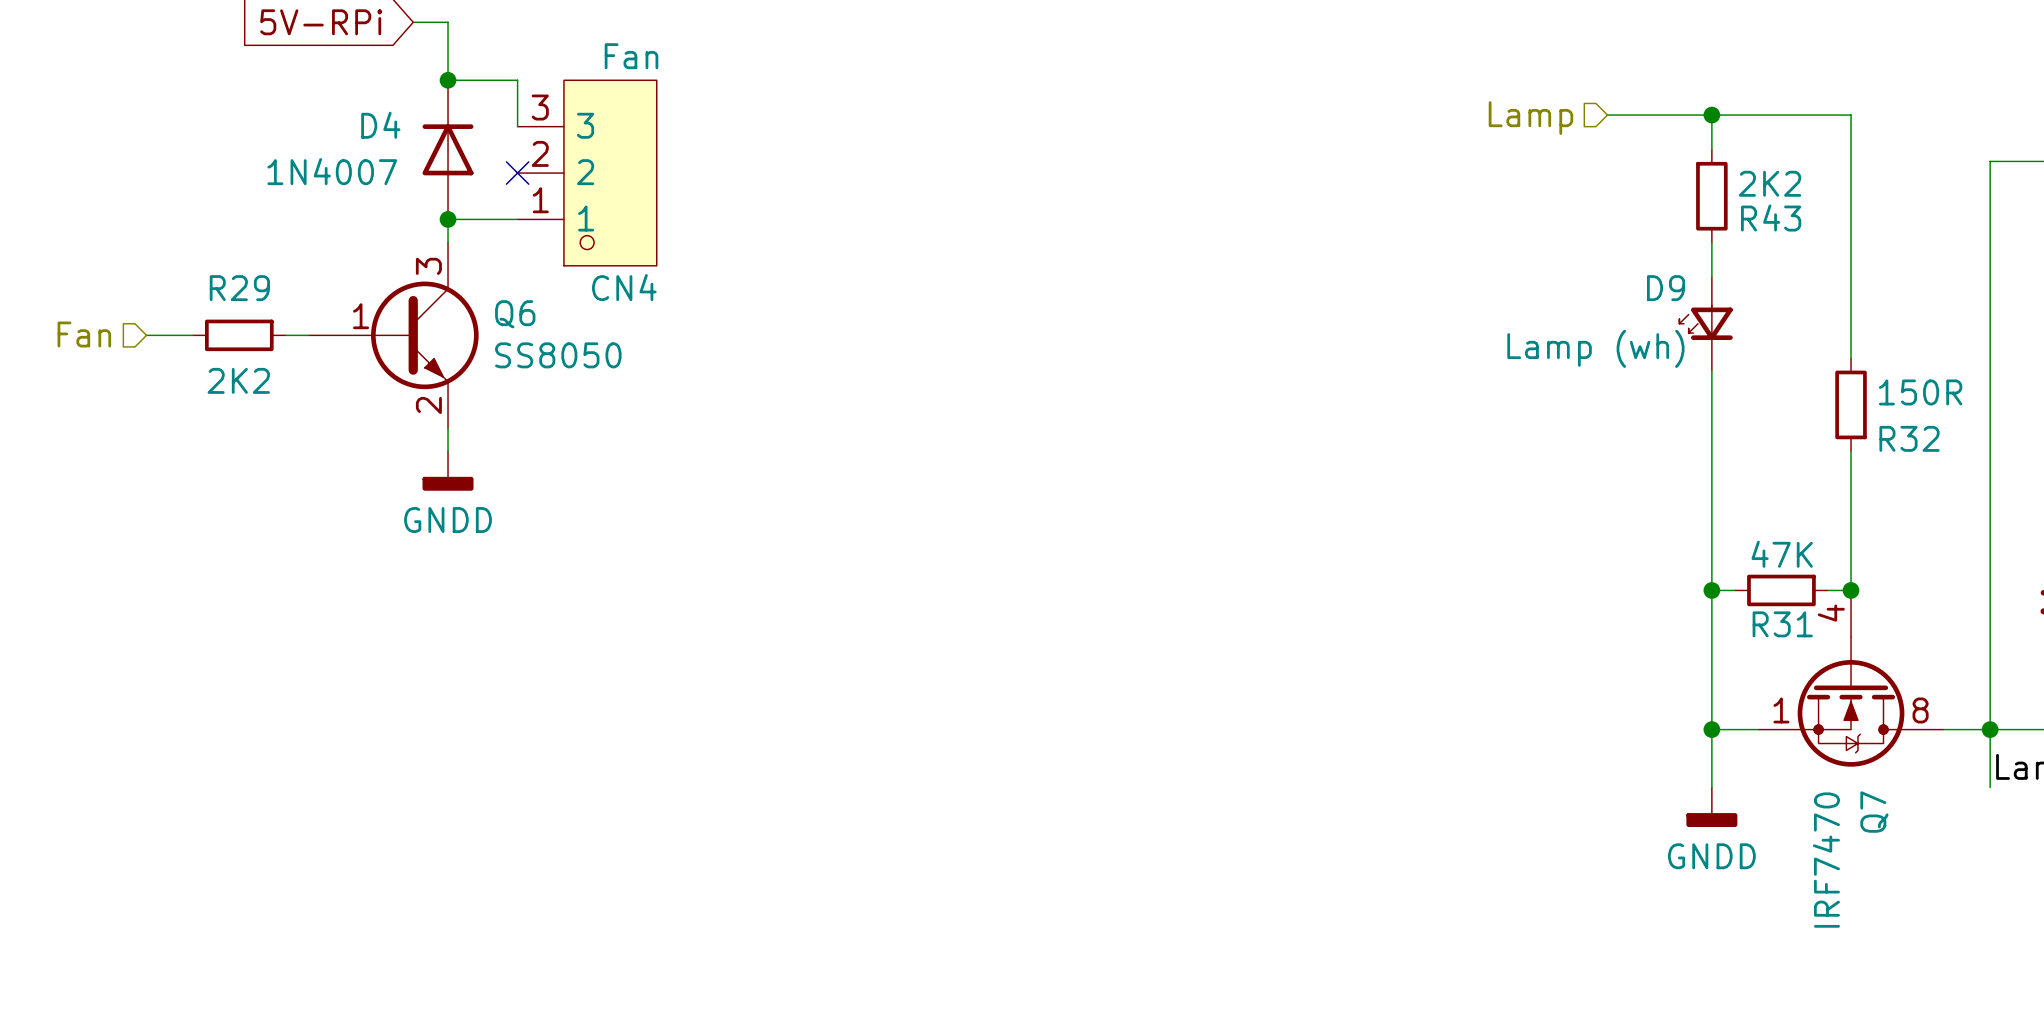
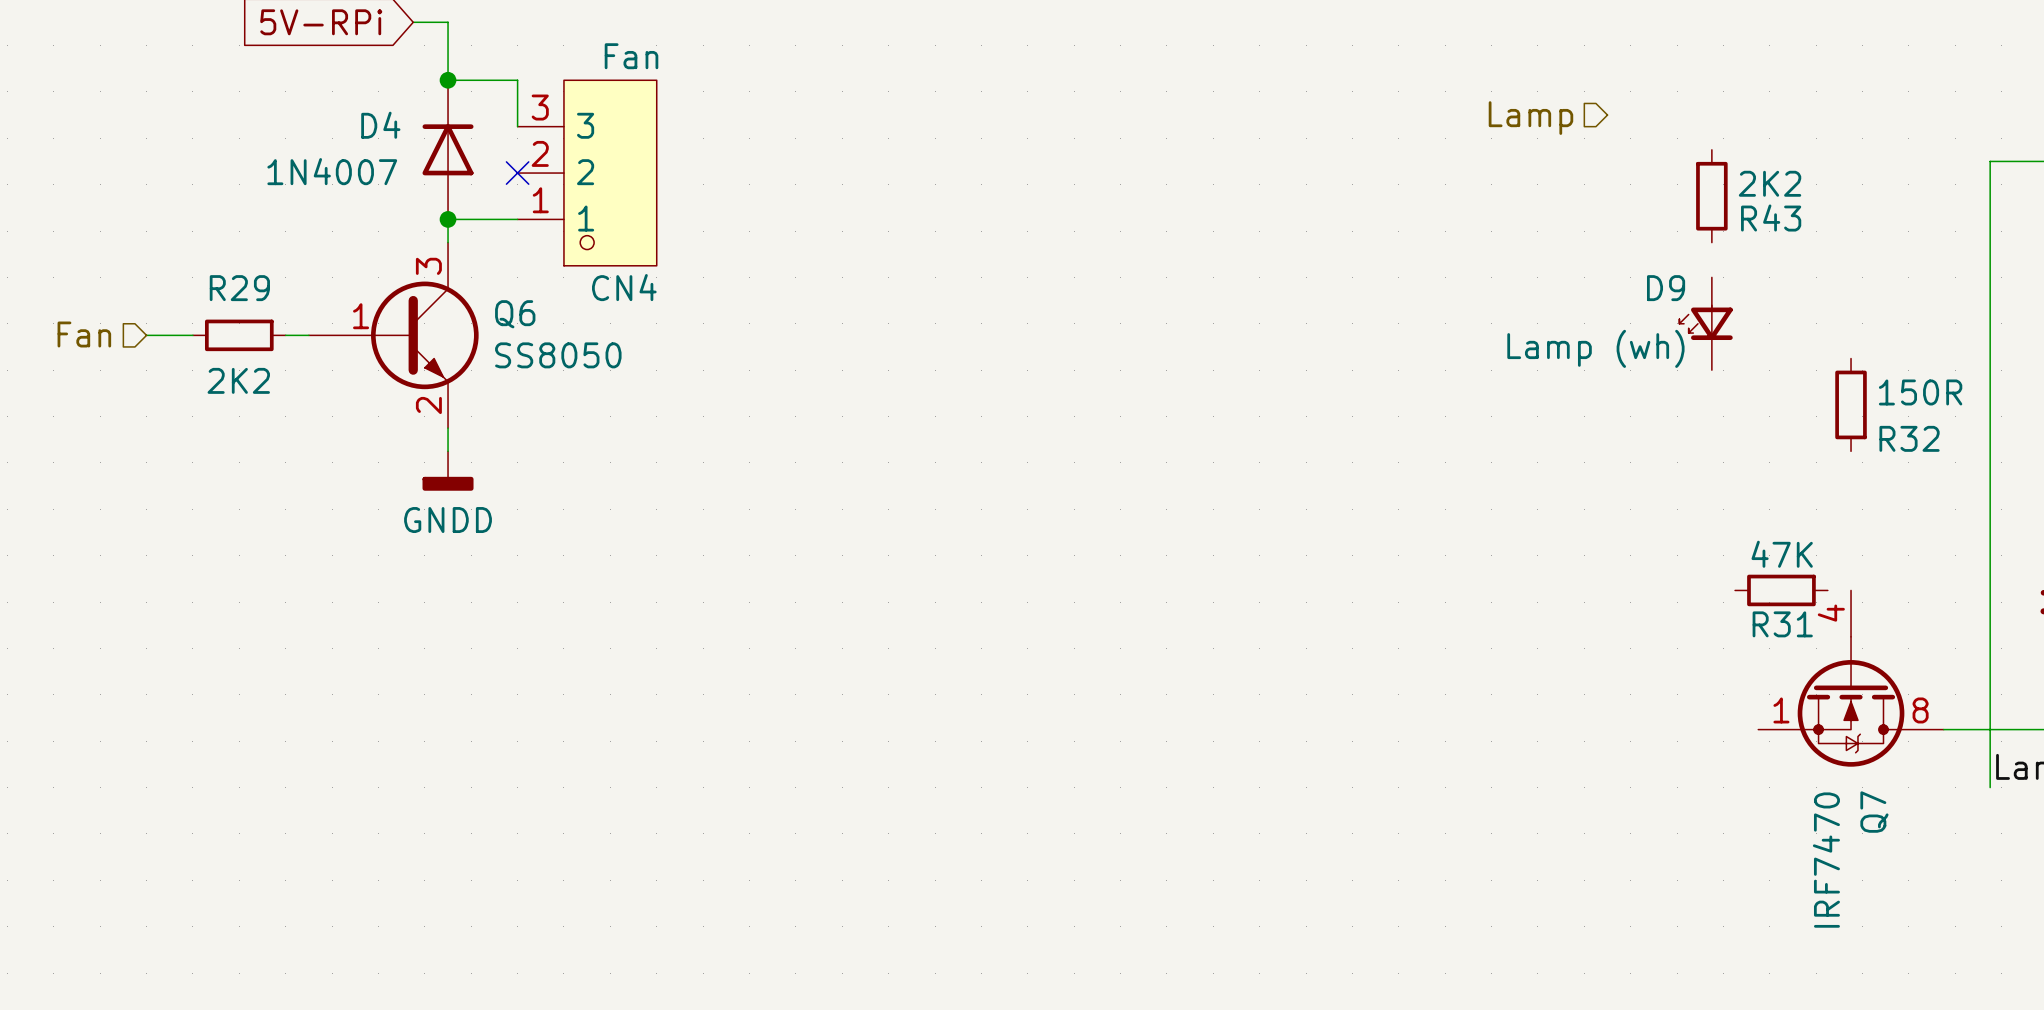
wire: (1607, 115) (1851, 115) (1851, 358) -> none
wire: (1711, 115) (1711, 149) -> none
junction: (1711, 115) -> none
wire: (1711, 242) (1711, 277) -> none
wire: (1711, 370) (1711, 729) -> none
wire: (1851, 451) (1851, 590) (1827, 590) -> none
wire: (1711, 590) (1735, 590) -> none
junction: (1711, 590) -> none
junction: (1851, 590) -> none
wire: (1711, 729) (1758, 729) -> none
wire: (1711, 729) (1711, 787) -> none
junction: (1711, 729) -> none
junction: (1990, 729) -> none
power symbol: GNDD (1711, 807) -> none

